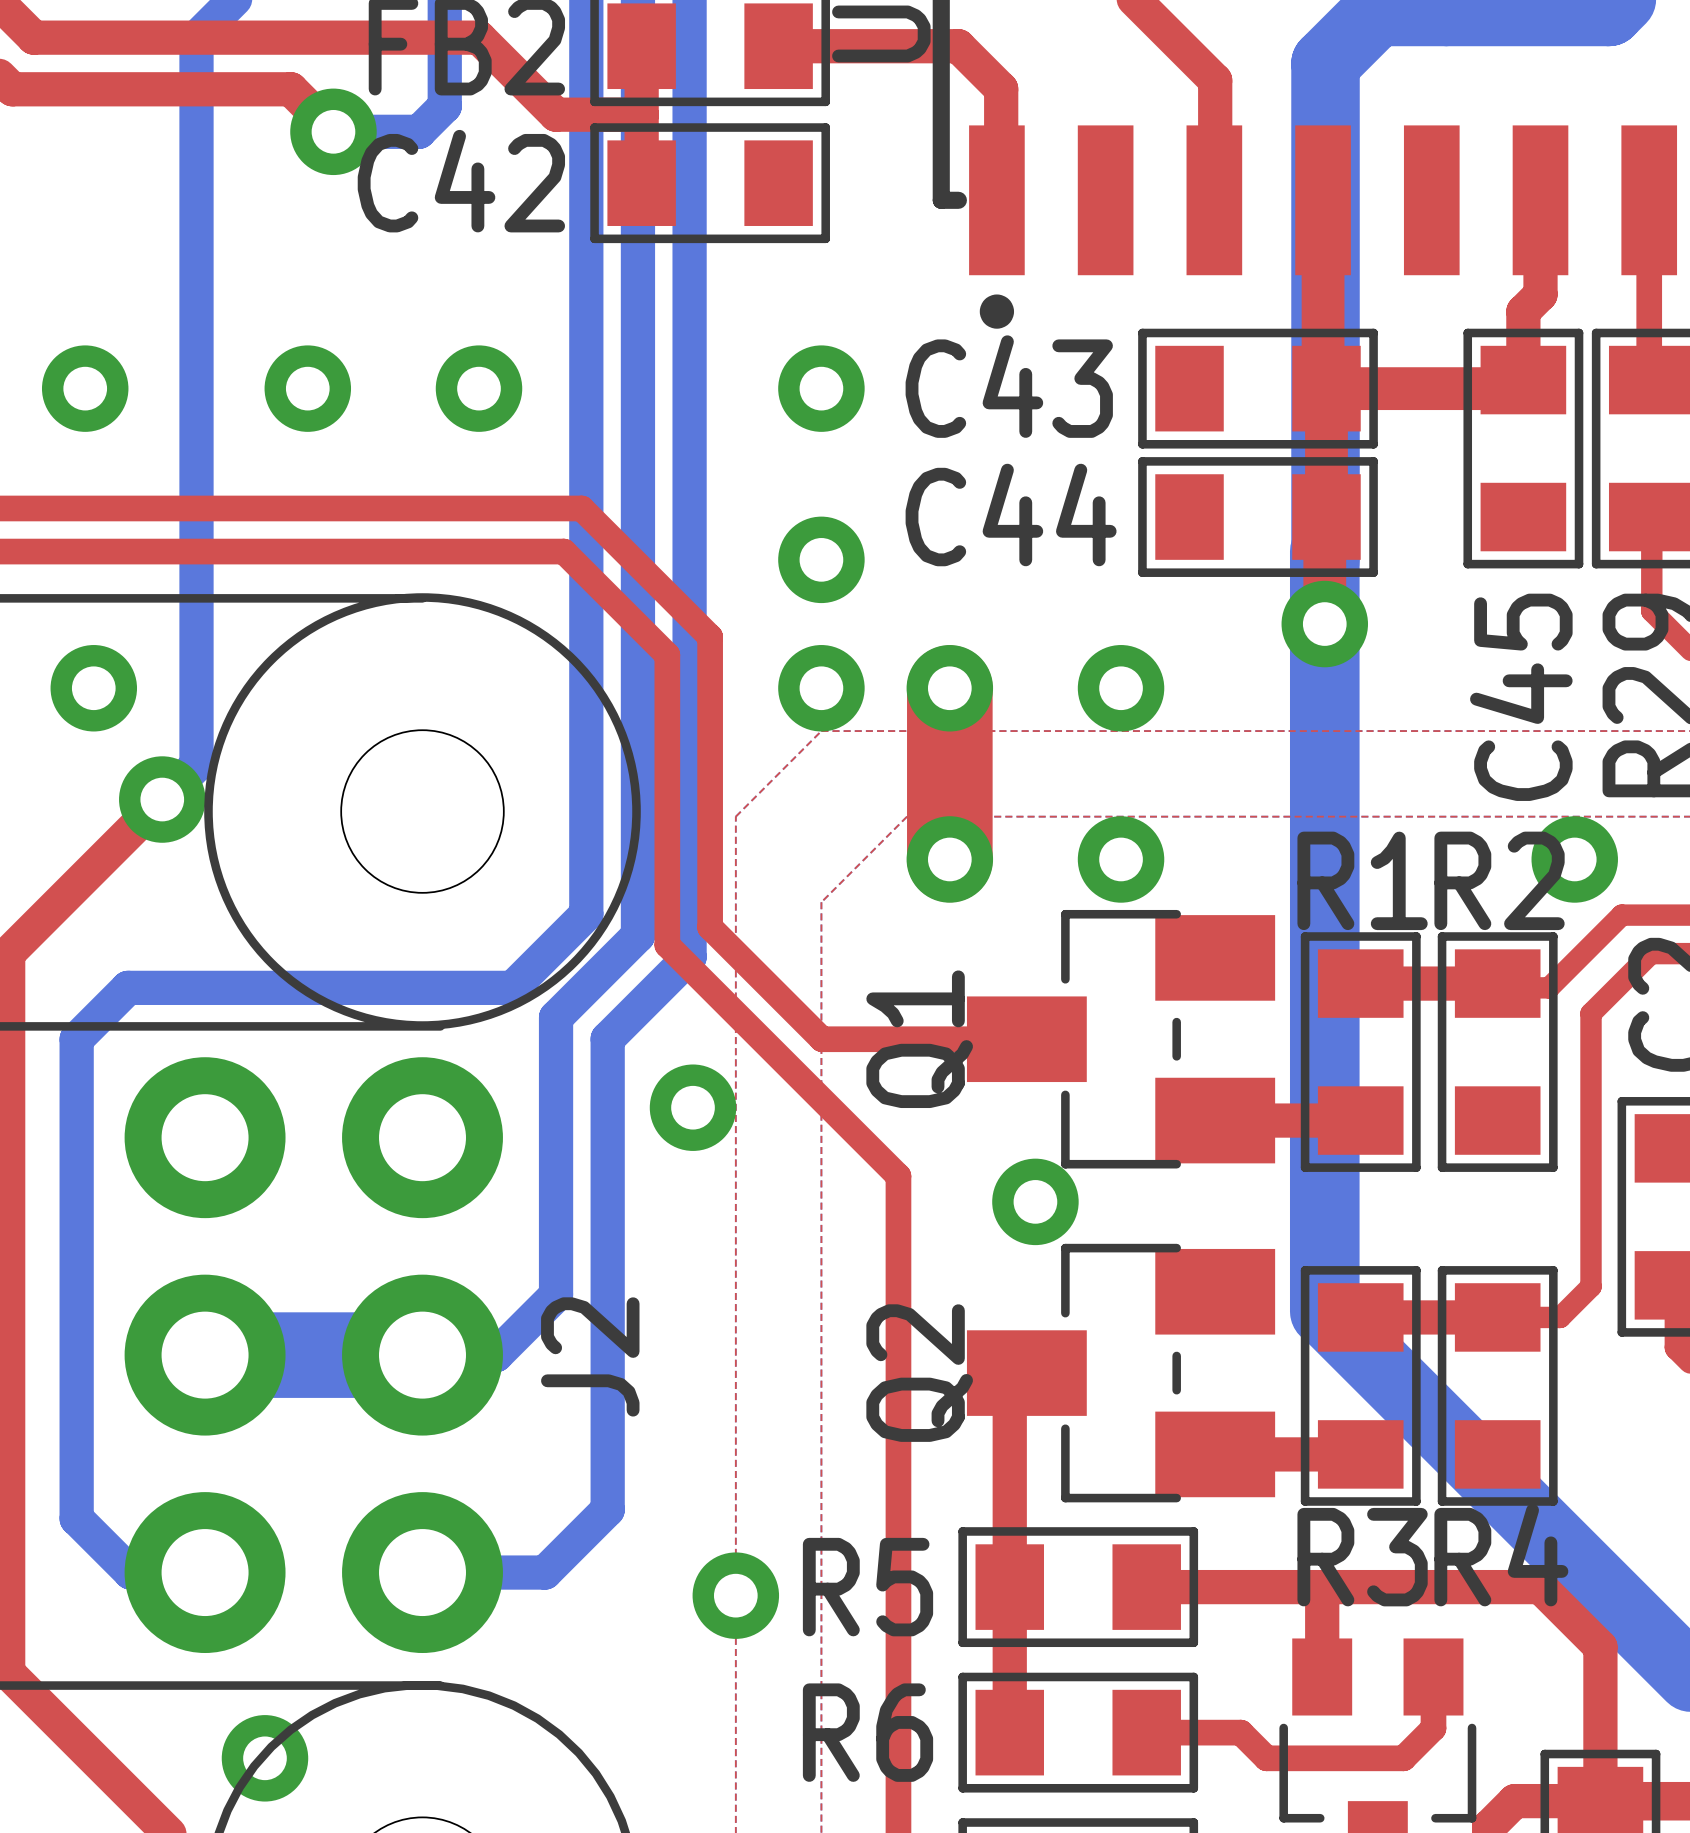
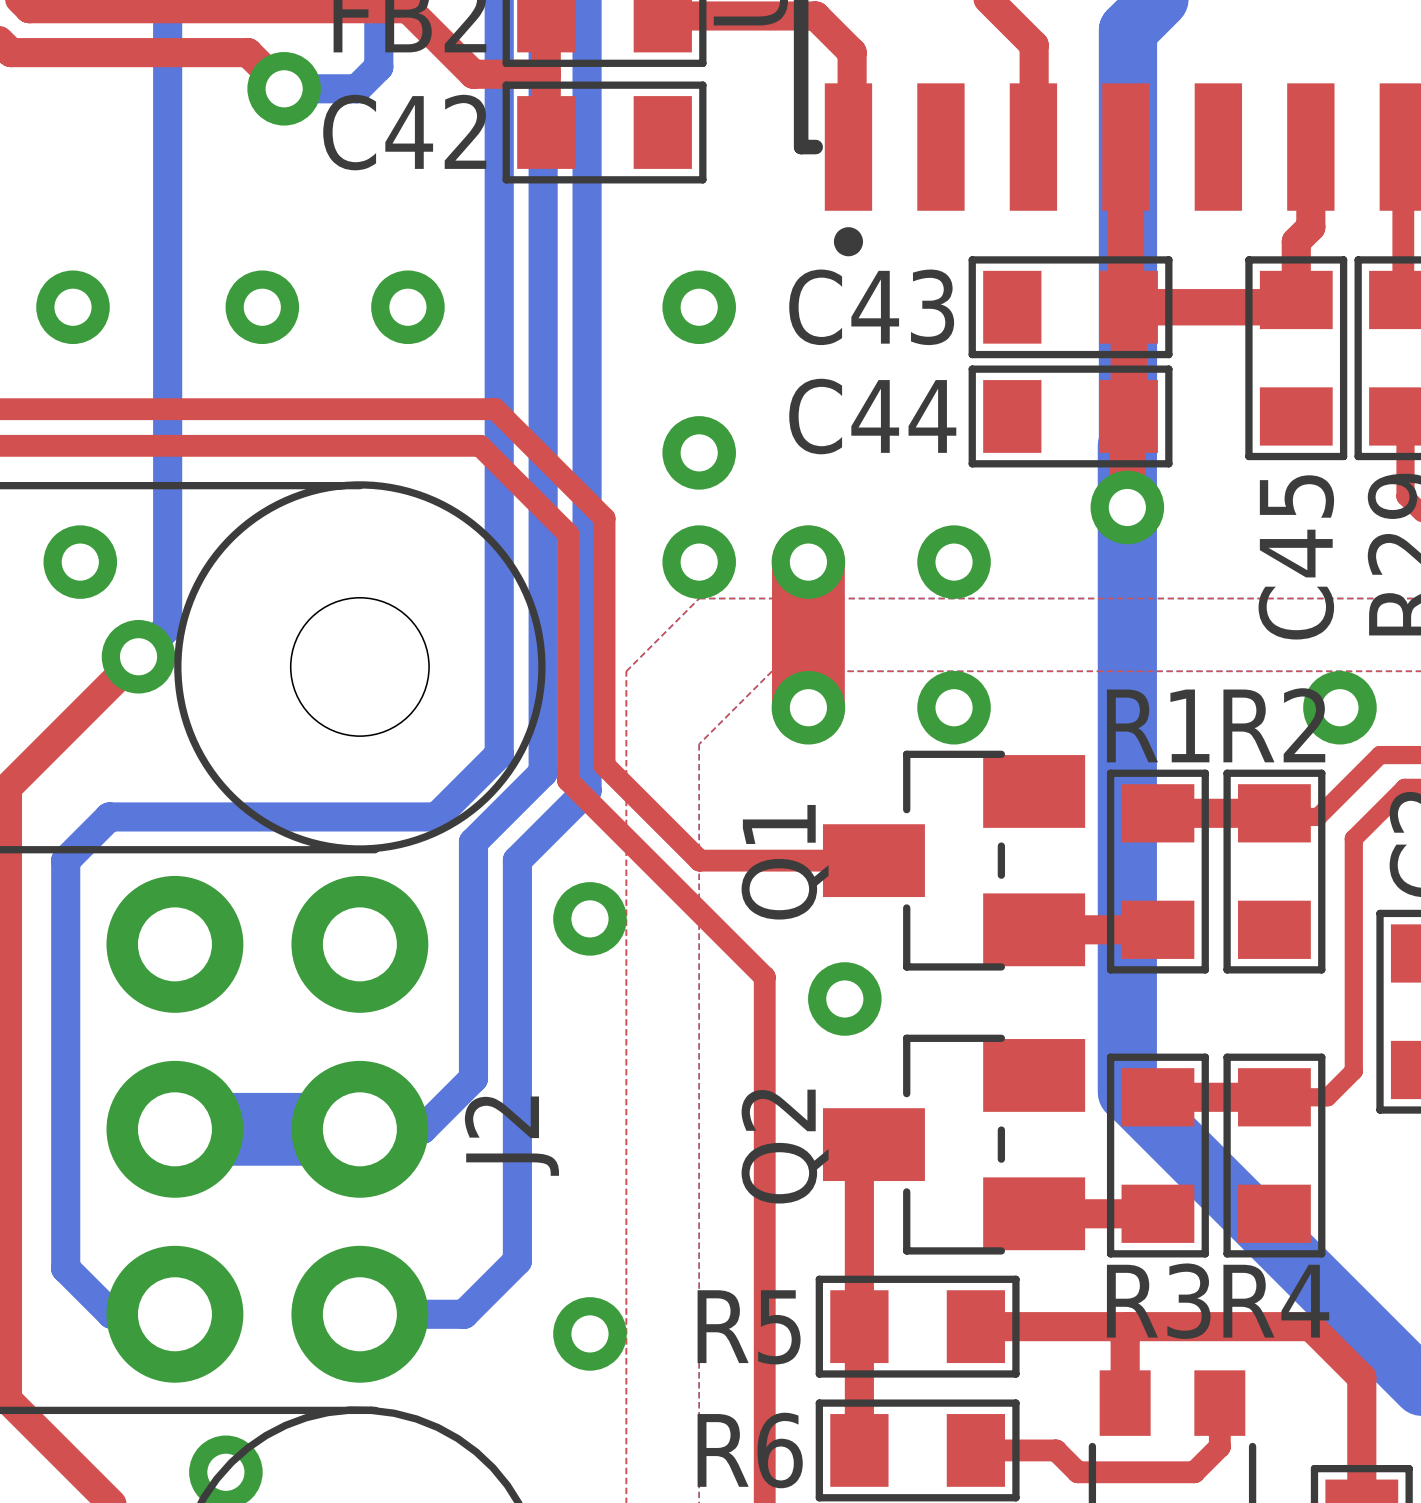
via position: (1035, 1201) -> (844, 998)
via position: (735, 1595) -> (589, 1333)

